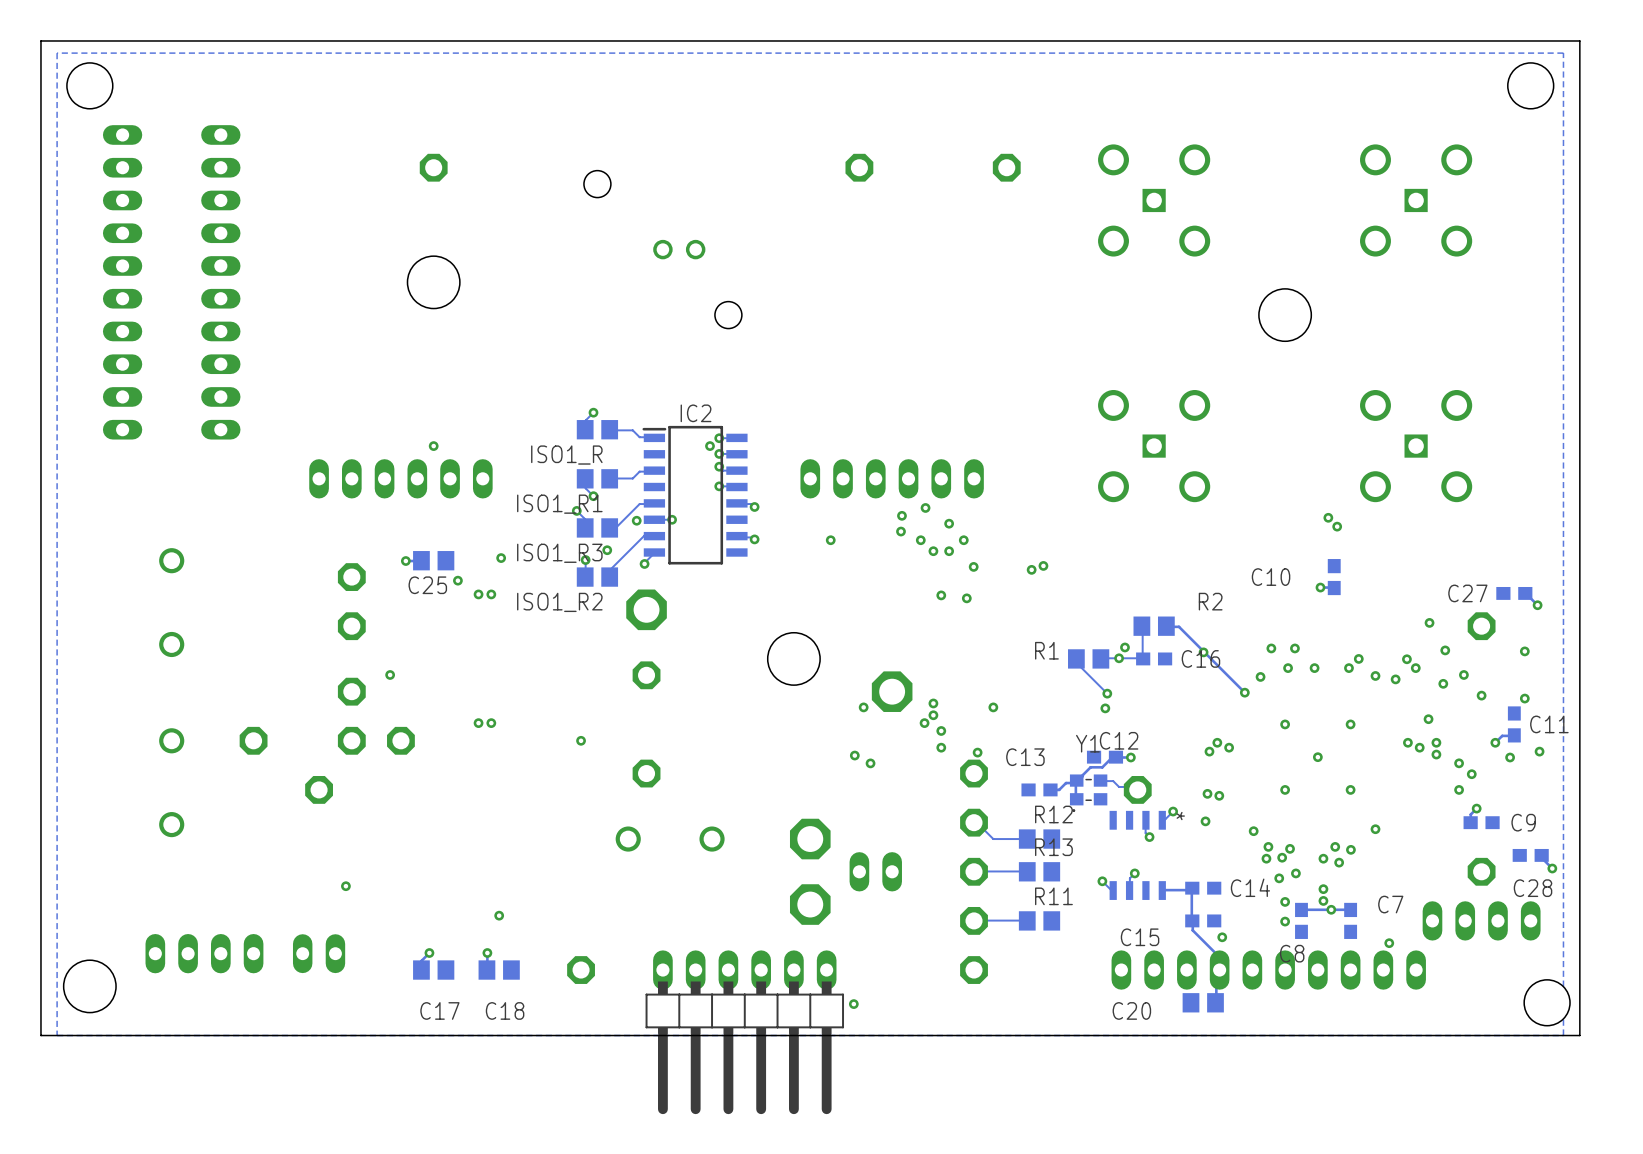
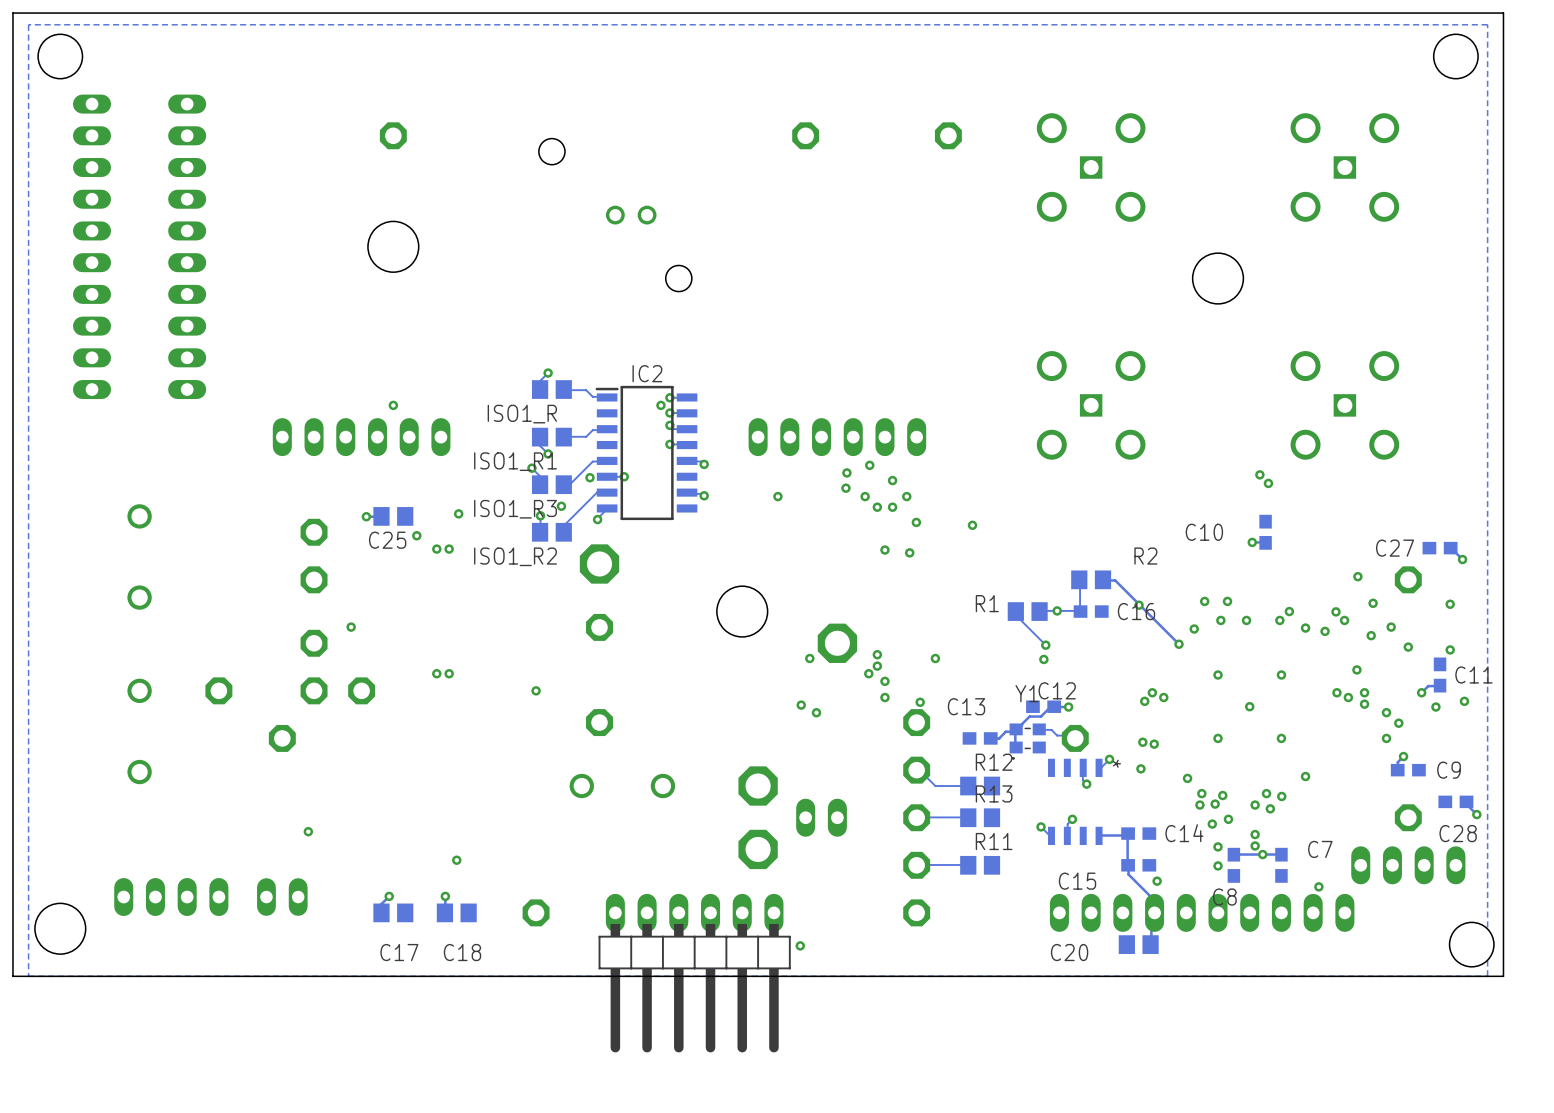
via: (1043, 565) -> none
via: (1124, 647) -> none

